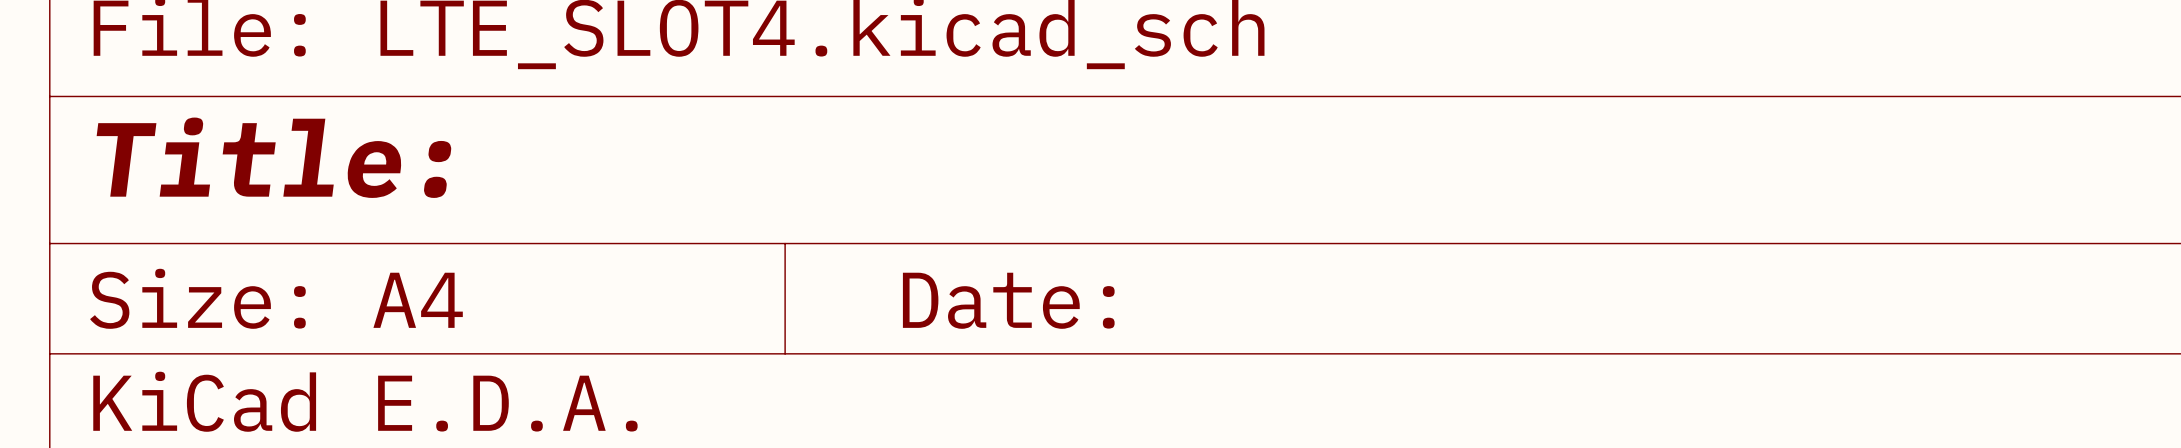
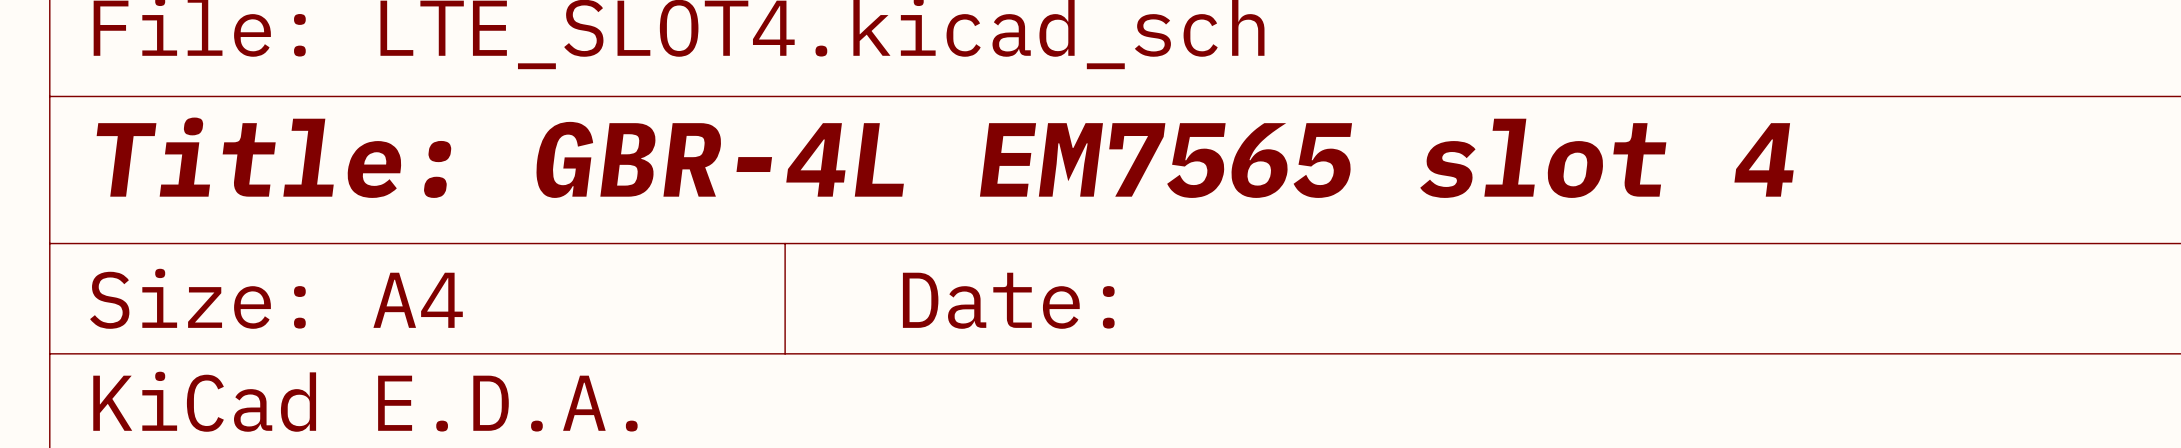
title block: Title: (274, 157) -> Title: GBR-4L EM7565 slot 4 (945, 157)

